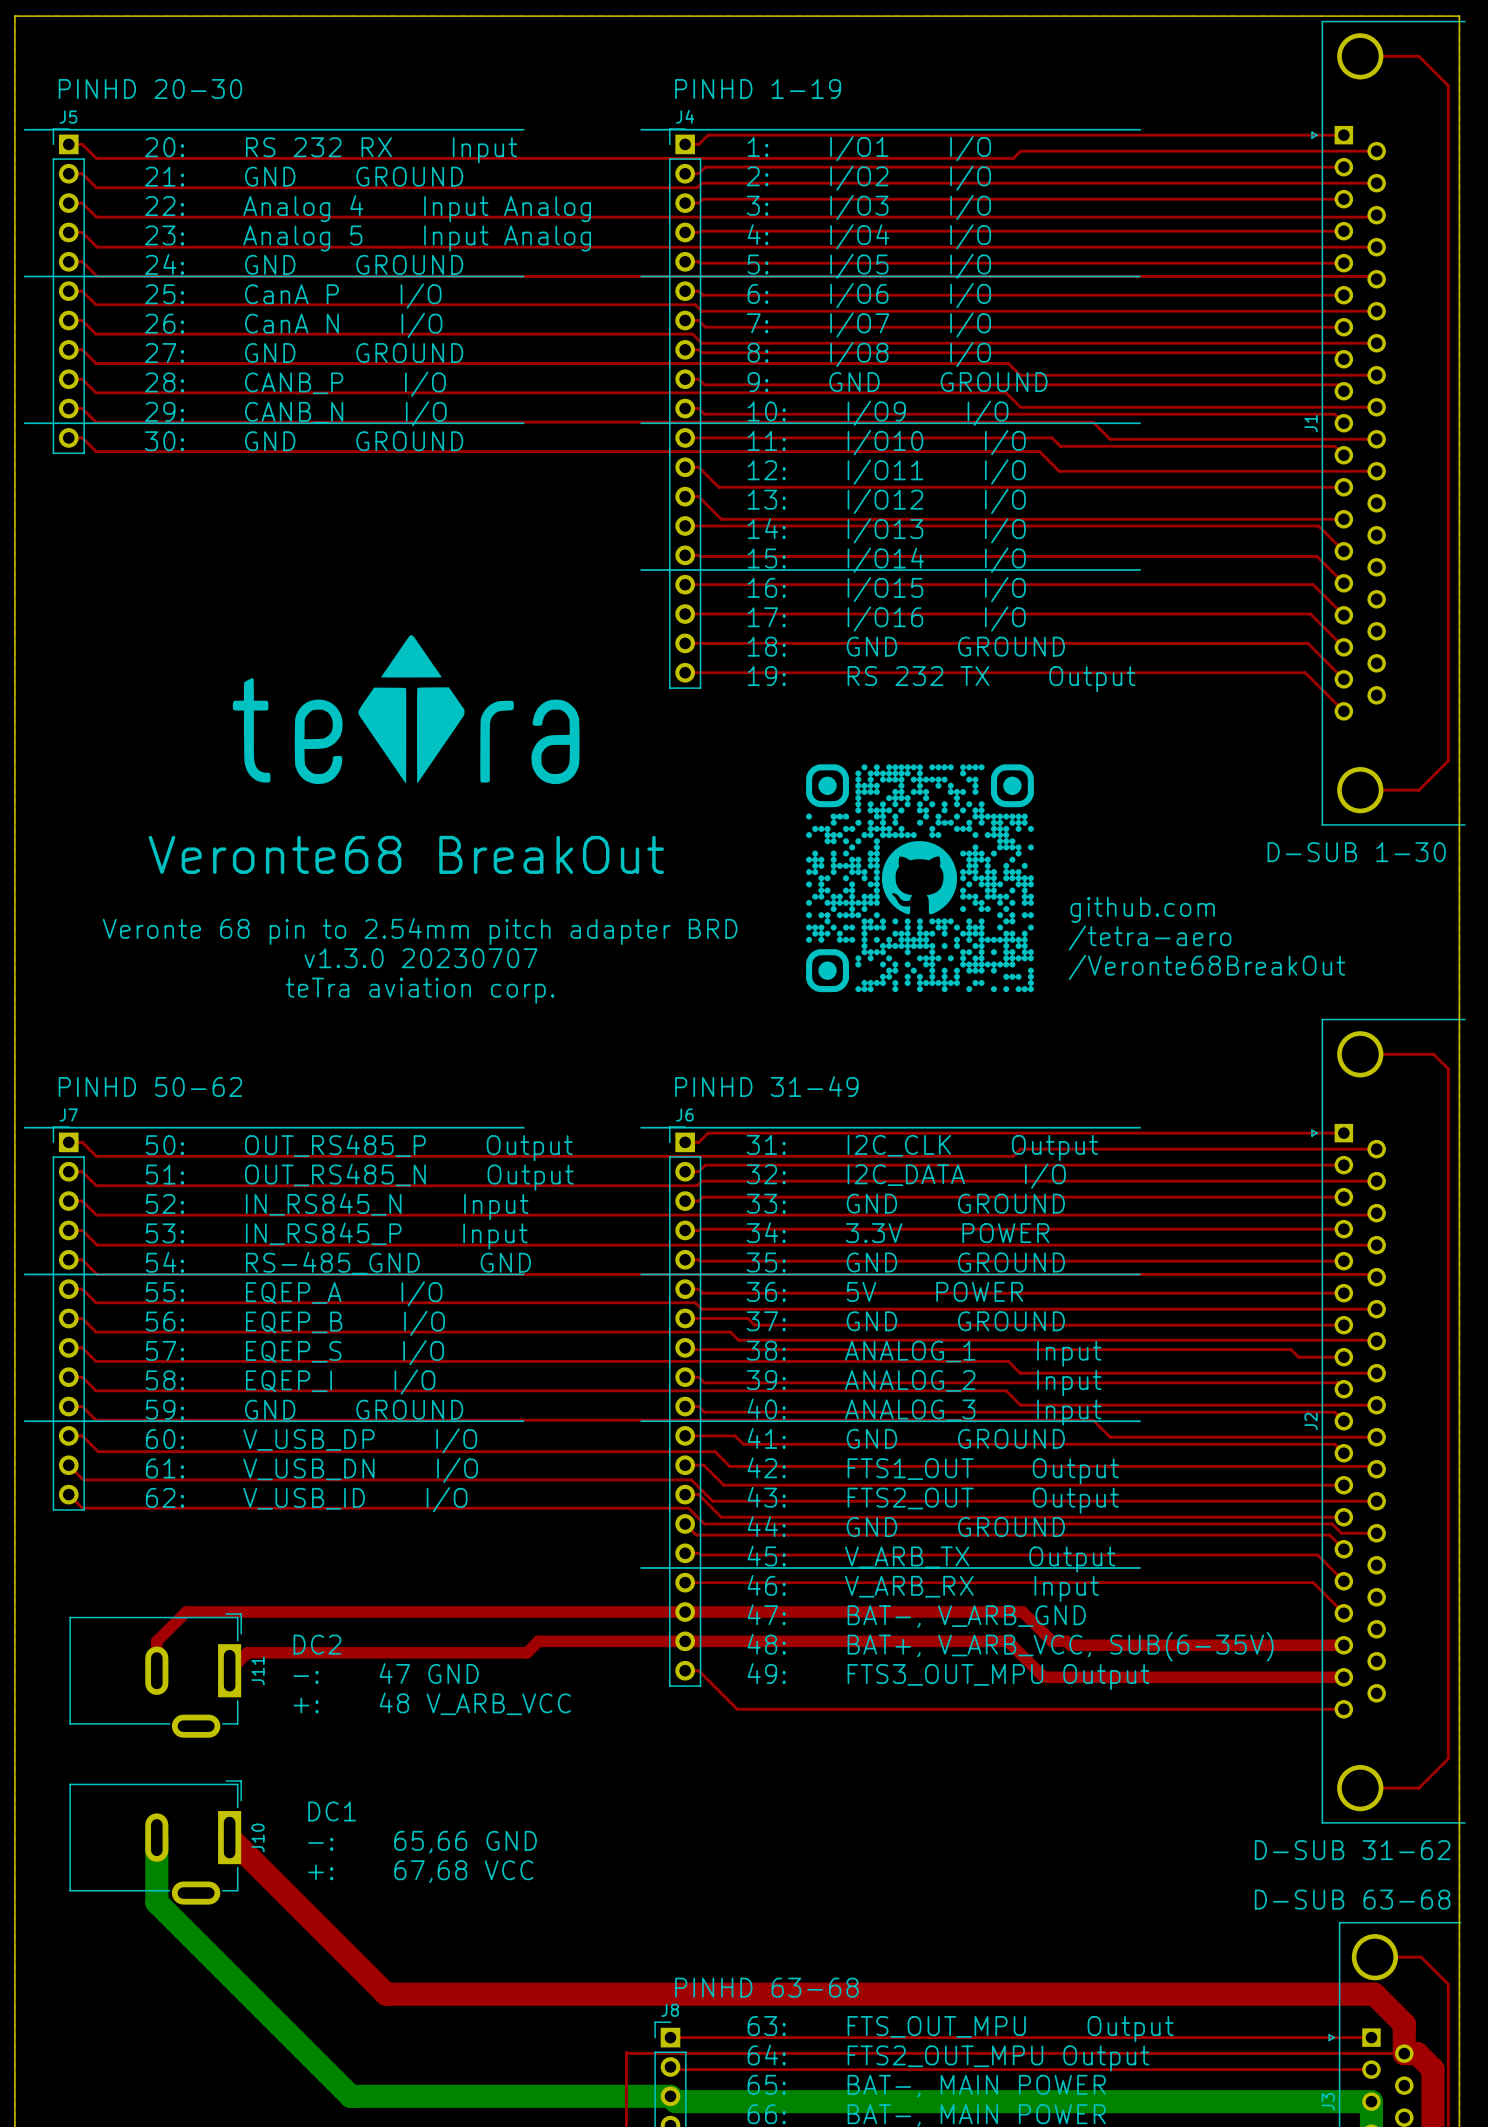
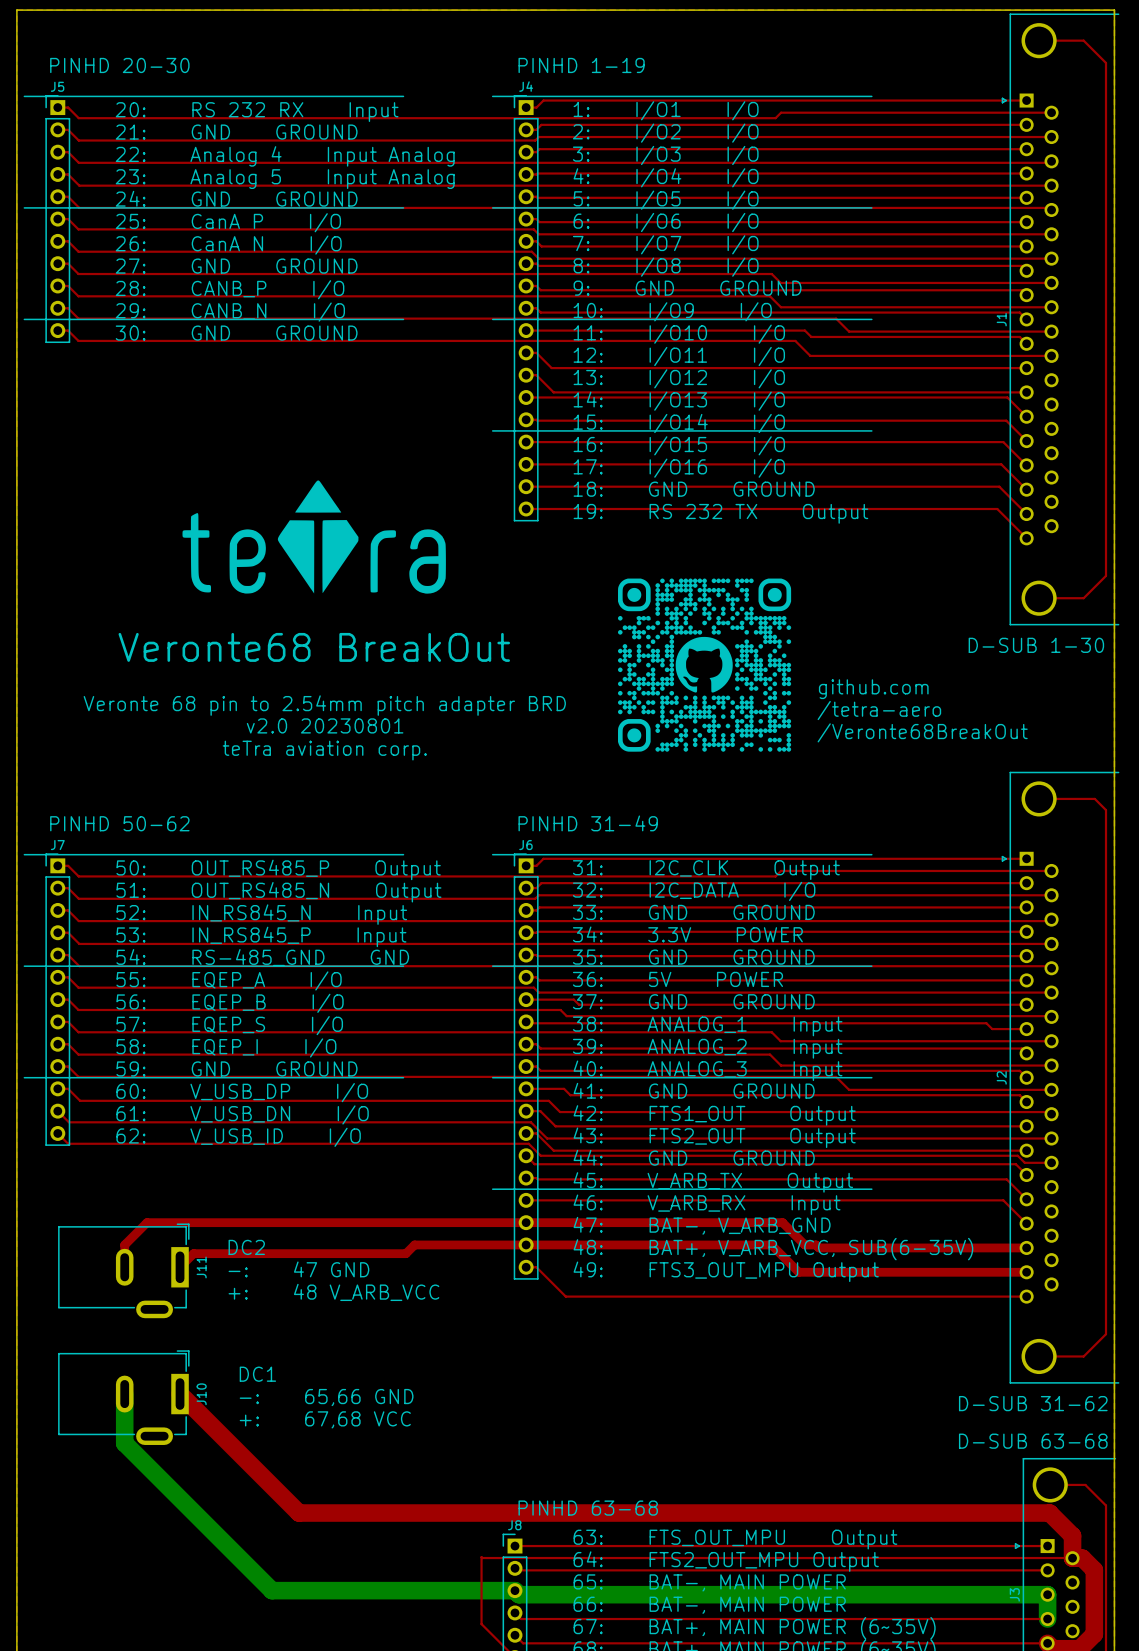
text: v1.3.0 20230707 (420, 958) -> v2.0 20230801 (325, 725)

